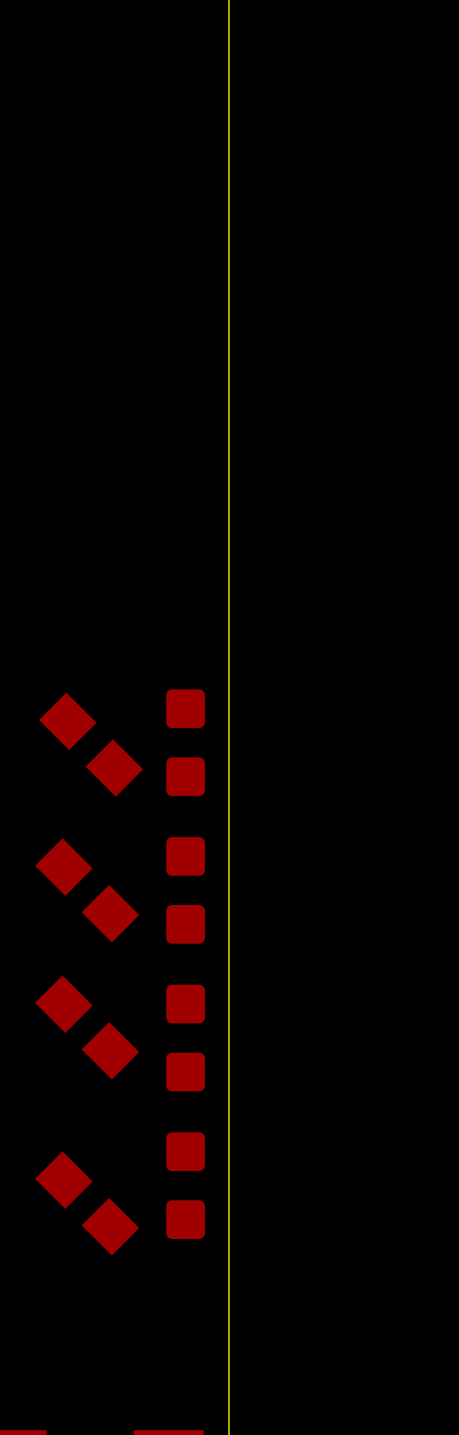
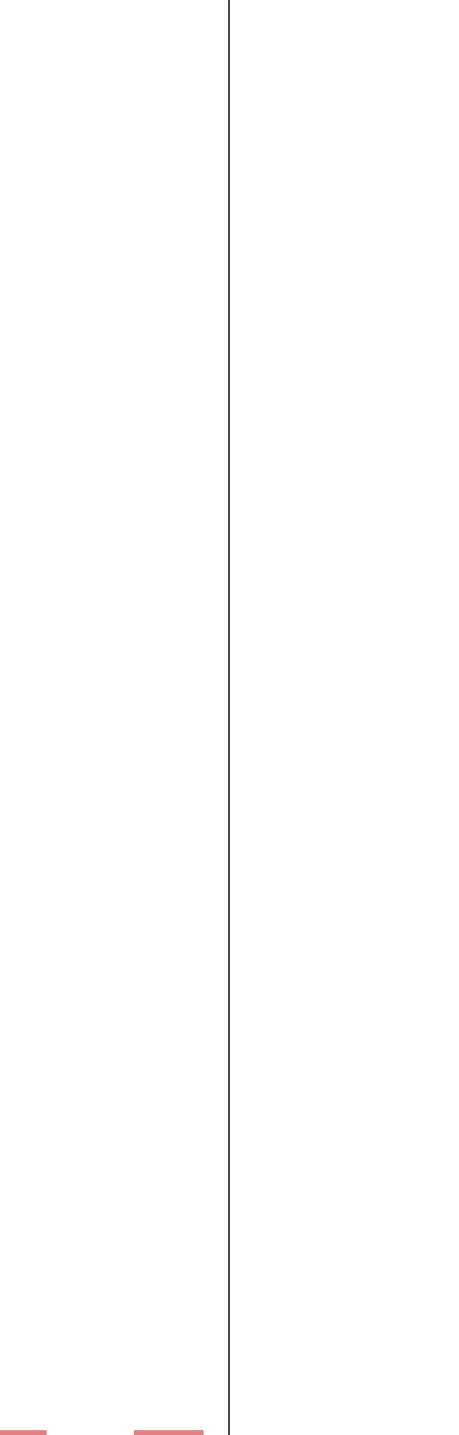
part: (185, 742) -> none
part: (91, 744) -> none
part: (87, 890) -> none
part: (185, 890) -> none
part: (87, 1027) -> none
part: (185, 1038) -> none
part: (185, 1185) -> none
part: (87, 1203) -> none

